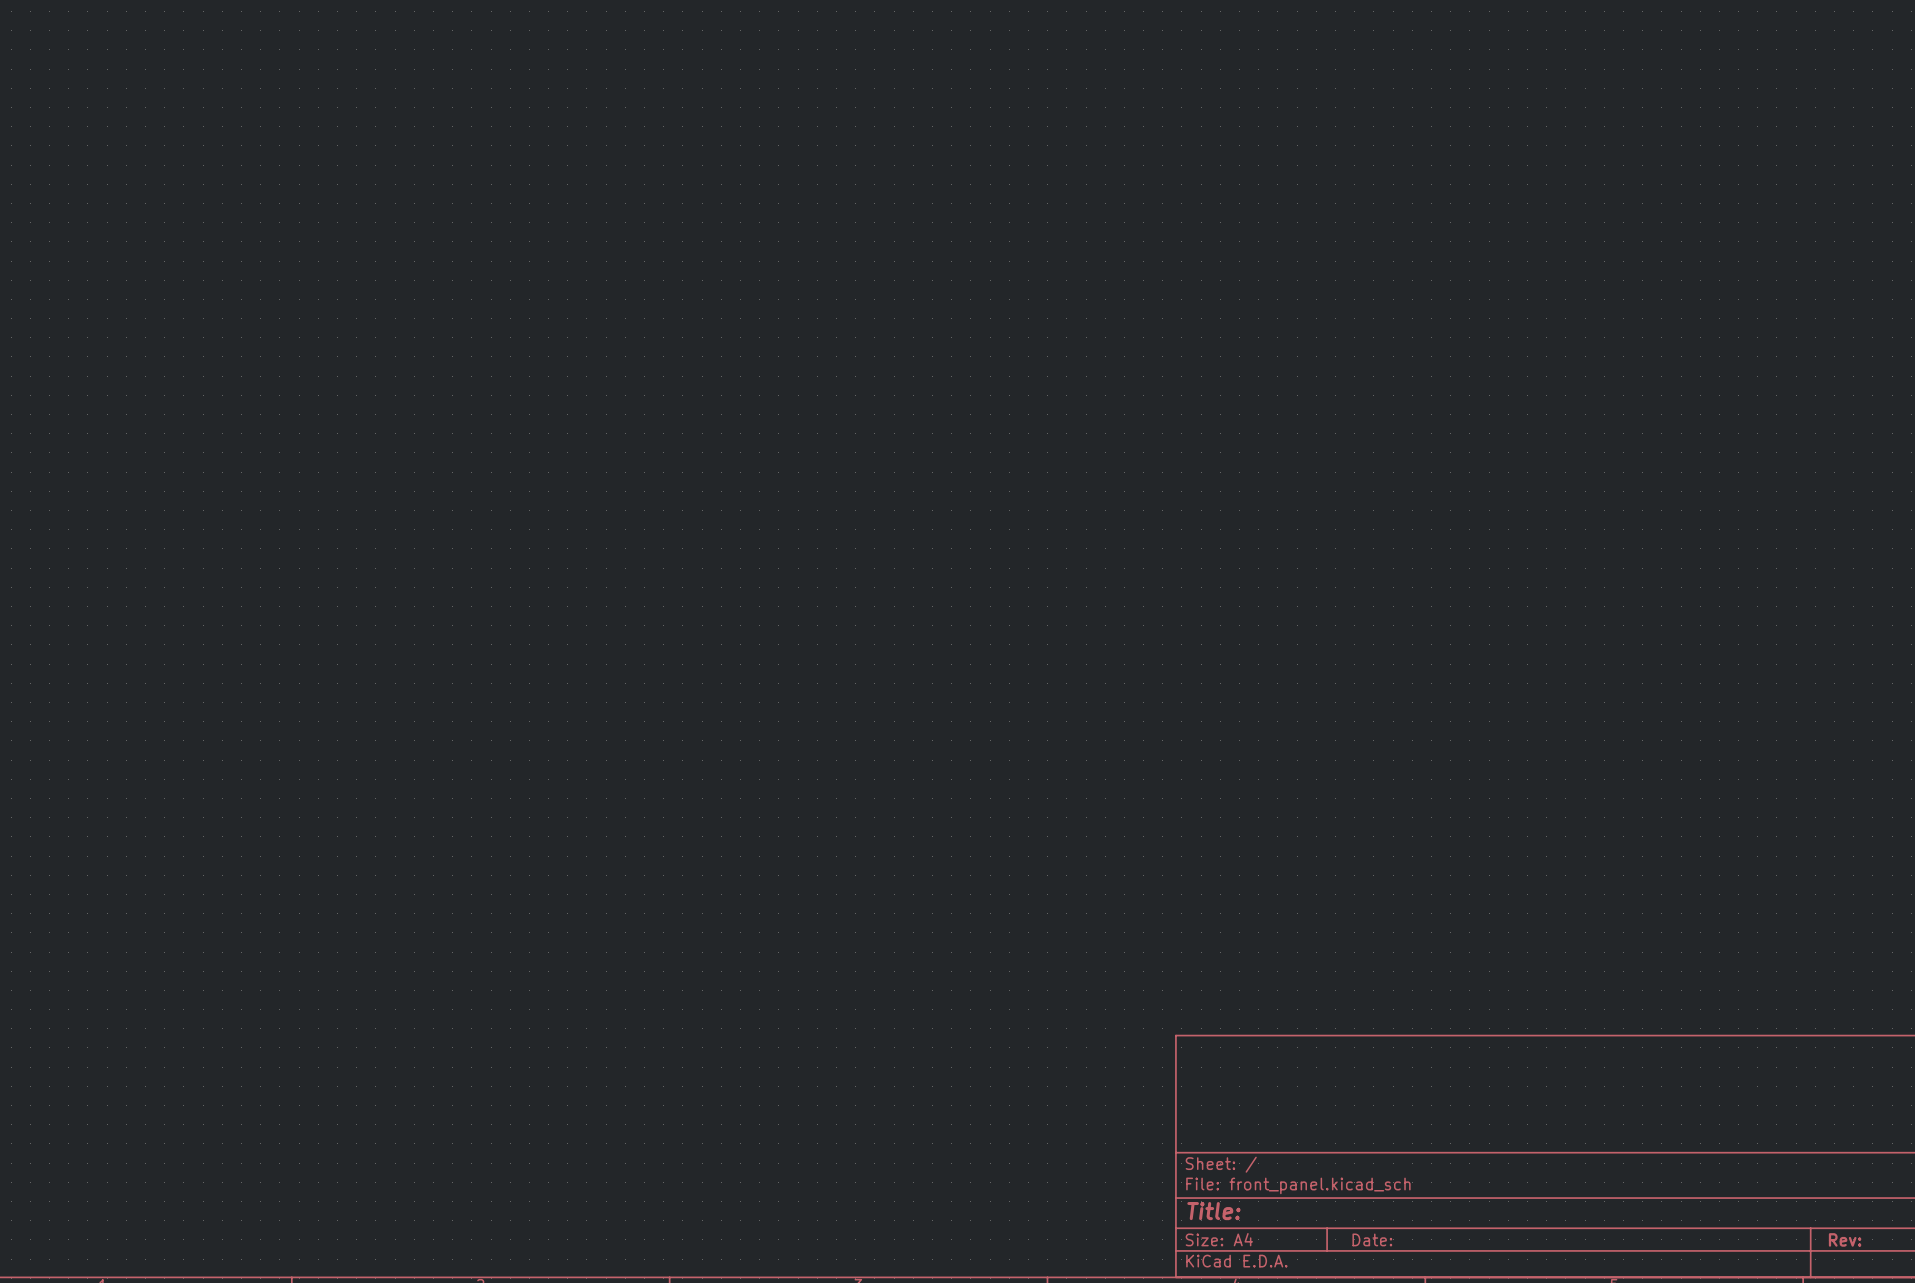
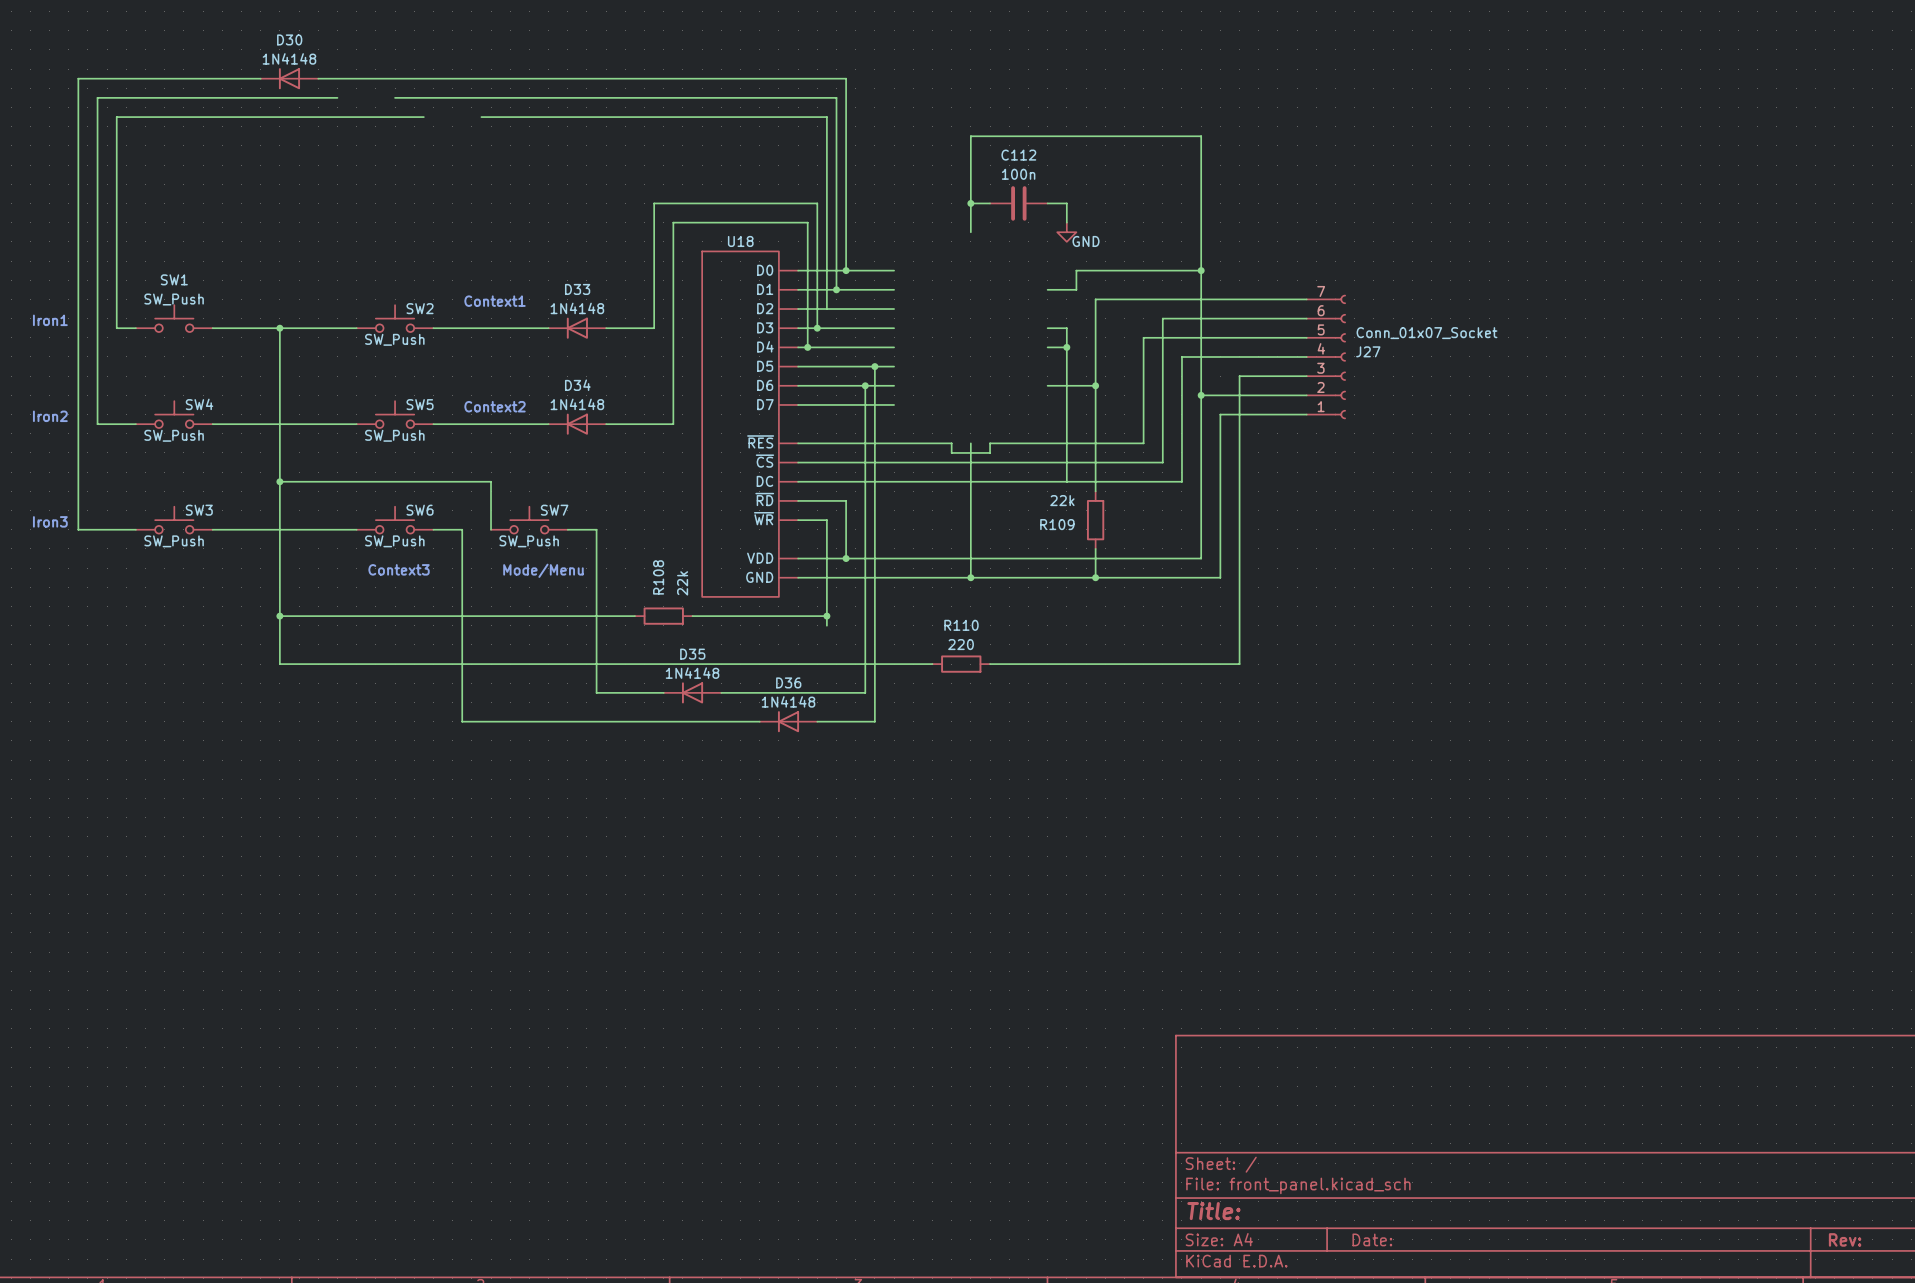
wire: none -> (260, 78) (78, 78) (78, 529) (135, 529)
D30: none -> 1N4148 (289, 78)
wire: none -> (318, 78) (846, 78) (846, 270)
wire: none -> (337, 97) (97, 97) (97, 424) (135, 424)
wire: none -> (395, 97) (836, 97) (836, 289)
wire: none -> (423, 117) (116, 117) (116, 328) (135, 328)
wire: none -> (481, 117) (826, 117) (826, 309)
wire: none -> (970, 203) (990, 203)
junction: none -> (970, 203)
C112: none -> 100n (1018, 203)
wire: none -> (1047, 203) (1066, 203) (1066, 222)
wire: none -> (970, 232) (970, 136) (1201, 136) (1201, 558) (798, 558)
power symbol: none -> GND (1066, 232)
wire: none -> (798, 270) (894, 270)
junction: none -> (846, 270)
wire: none -> (1201, 270) (1076, 270) (1076, 289) (1047, 289)
junction: none -> (1201, 270)
wire: none -> (798, 289) (894, 289)
junction: none -> (836, 289)
wire: none -> (1306, 299) (1095, 299) (1095, 491)
text: none -> Context1 (495, 301)
wire: none -> (798, 309) (894, 309)
SW1: none -> SW_Push (174, 318)
SW2: none -> SW_Push (395, 318)
wire: none -> (1306, 318) (1162, 318) (1162, 462) (798, 462)
text: none -> Iron1 (50, 320)
wire: none -> (212, 328) (356, 328)
wire: none -> (279, 328) (279, 664) (932, 664)
junction: none -> (279, 328)
wire: none -> (433, 328) (548, 328)
D33: none -> 1N4148 (577, 328)
wire: none -> (606, 328) (654, 328) (654, 203) (817, 203) (817, 328)
wire: none -> (798, 328) (894, 328)
junction: none -> (817, 328)
wire: none -> (1047, 328) (1066, 328) (1066, 481)
wire: none -> (1306, 337) (1143, 337) (1143, 443) (990, 443) (990, 452) (951, 452) (951, 443) (798, 443)
wire: none -> (798, 347) (894, 347)
wire: none -> (807, 347) (807, 222) (673, 222) (673, 424) (606, 424)
junction: none -> (807, 347)
wire: none -> (1047, 347) (1066, 347)
junction: none -> (1066, 347)
wire: none -> (1306, 356) (1181, 356) (1181, 481) (798, 481)
J27: none -> Conn_01x07_Socket (1326, 356)
wire: none -> (798, 366) (894, 366)
wire: none -> (874, 366) (874, 721) (817, 721)
junction: none -> (874, 366)
wire: none -> (1306, 376) (1239, 376) (1239, 664) (990, 664)
wire: none -> (798, 385) (894, 385)
wire: none -> (865, 385) (865, 692) (721, 692)
junction: none -> (865, 385)
wire: none -> (1047, 385) (1095, 385)
junction: none -> (1095, 385)
wire: none -> (1201, 395) (1306, 395)
junction: none -> (1201, 395)
wire: none -> (798, 404) (894, 404)
text: none -> Context2 (495, 406)
SW4: none -> SW_Push (174, 414)
SW5: none -> SW_Push (395, 414)
wire: none -> (1306, 414) (1220, 414) (1220, 577) (798, 577)
text: none -> Iron2 (50, 416)
wire: none -> (212, 424) (356, 424)
wire: none -> (433, 424) (548, 424)
D34: none -> 1N4148 (577, 424)
U18: none -> (750, 424)
wire: none -> (970, 443) (970, 577)
wire: none -> (279, 481) (491, 481) (491, 529)
junction: none -> (279, 481)
wire: none -> (798, 500) (846, 500) (846, 558)
SW3: none -> SW_Push (174, 520)
SW6: none -> SW_Push (395, 520)
SW7: none -> SW_Push (529, 520)
wire: none -> (798, 520) (826, 520) (826, 625)
R109: none -> (1095, 520)
text: none -> Iron3 (50, 521)
wire: none -> (212, 529) (356, 529)
wire: none -> (433, 529) (462, 529) (462, 721) (759, 721)
wire: none -> (567, 529) (596, 529) (596, 692) (663, 692)
wire: none -> (1095, 548) (1095, 577)
junction: none -> (846, 558)
text: none -> Context3 (399, 569)
text: none -> Mode/Menu (543, 570)
junction: none -> (970, 577)
junction: none -> (1095, 577)
wire: none -> (279, 616) (634, 616)
junction: none -> (279, 616)
R108: none -> (663, 616)
wire: none -> (692, 616) (826, 616)
junction: none -> (826, 616)
R110: none -> 220 (961, 664)
D35: none -> 1N4148 (692, 692)
D36: none -> 1N4148 (788, 721)

